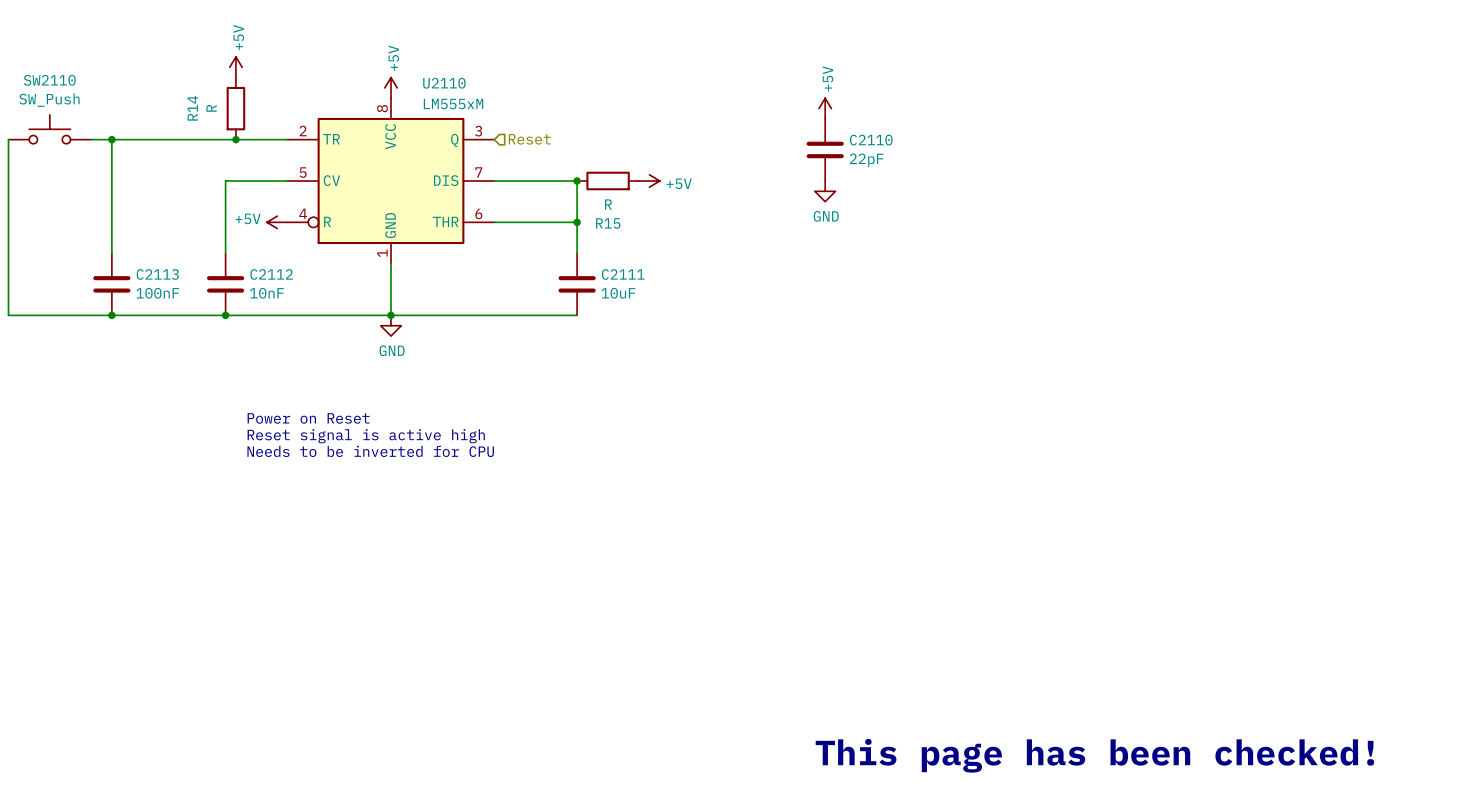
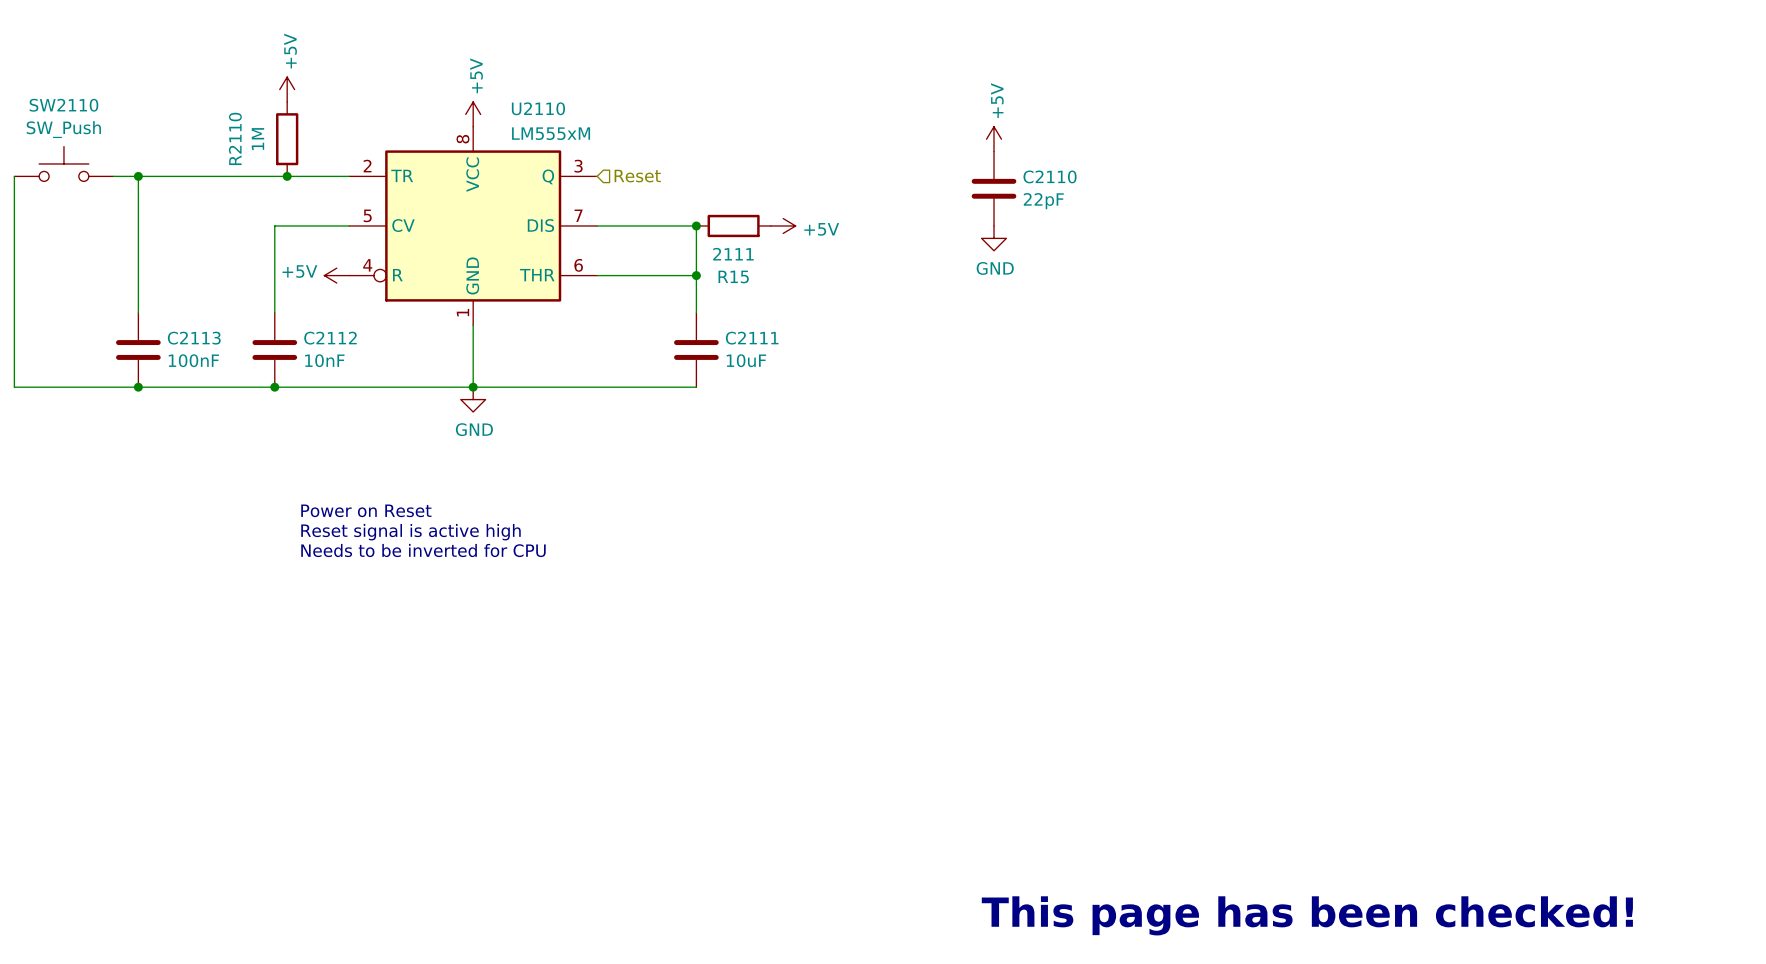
R14 name: R14 (192, 108) -> R2110 (235, 138)
R14 value: R (211, 108) -> 1M (257, 139)
R15 value: R (608, 204) -> 2111 (733, 254)

